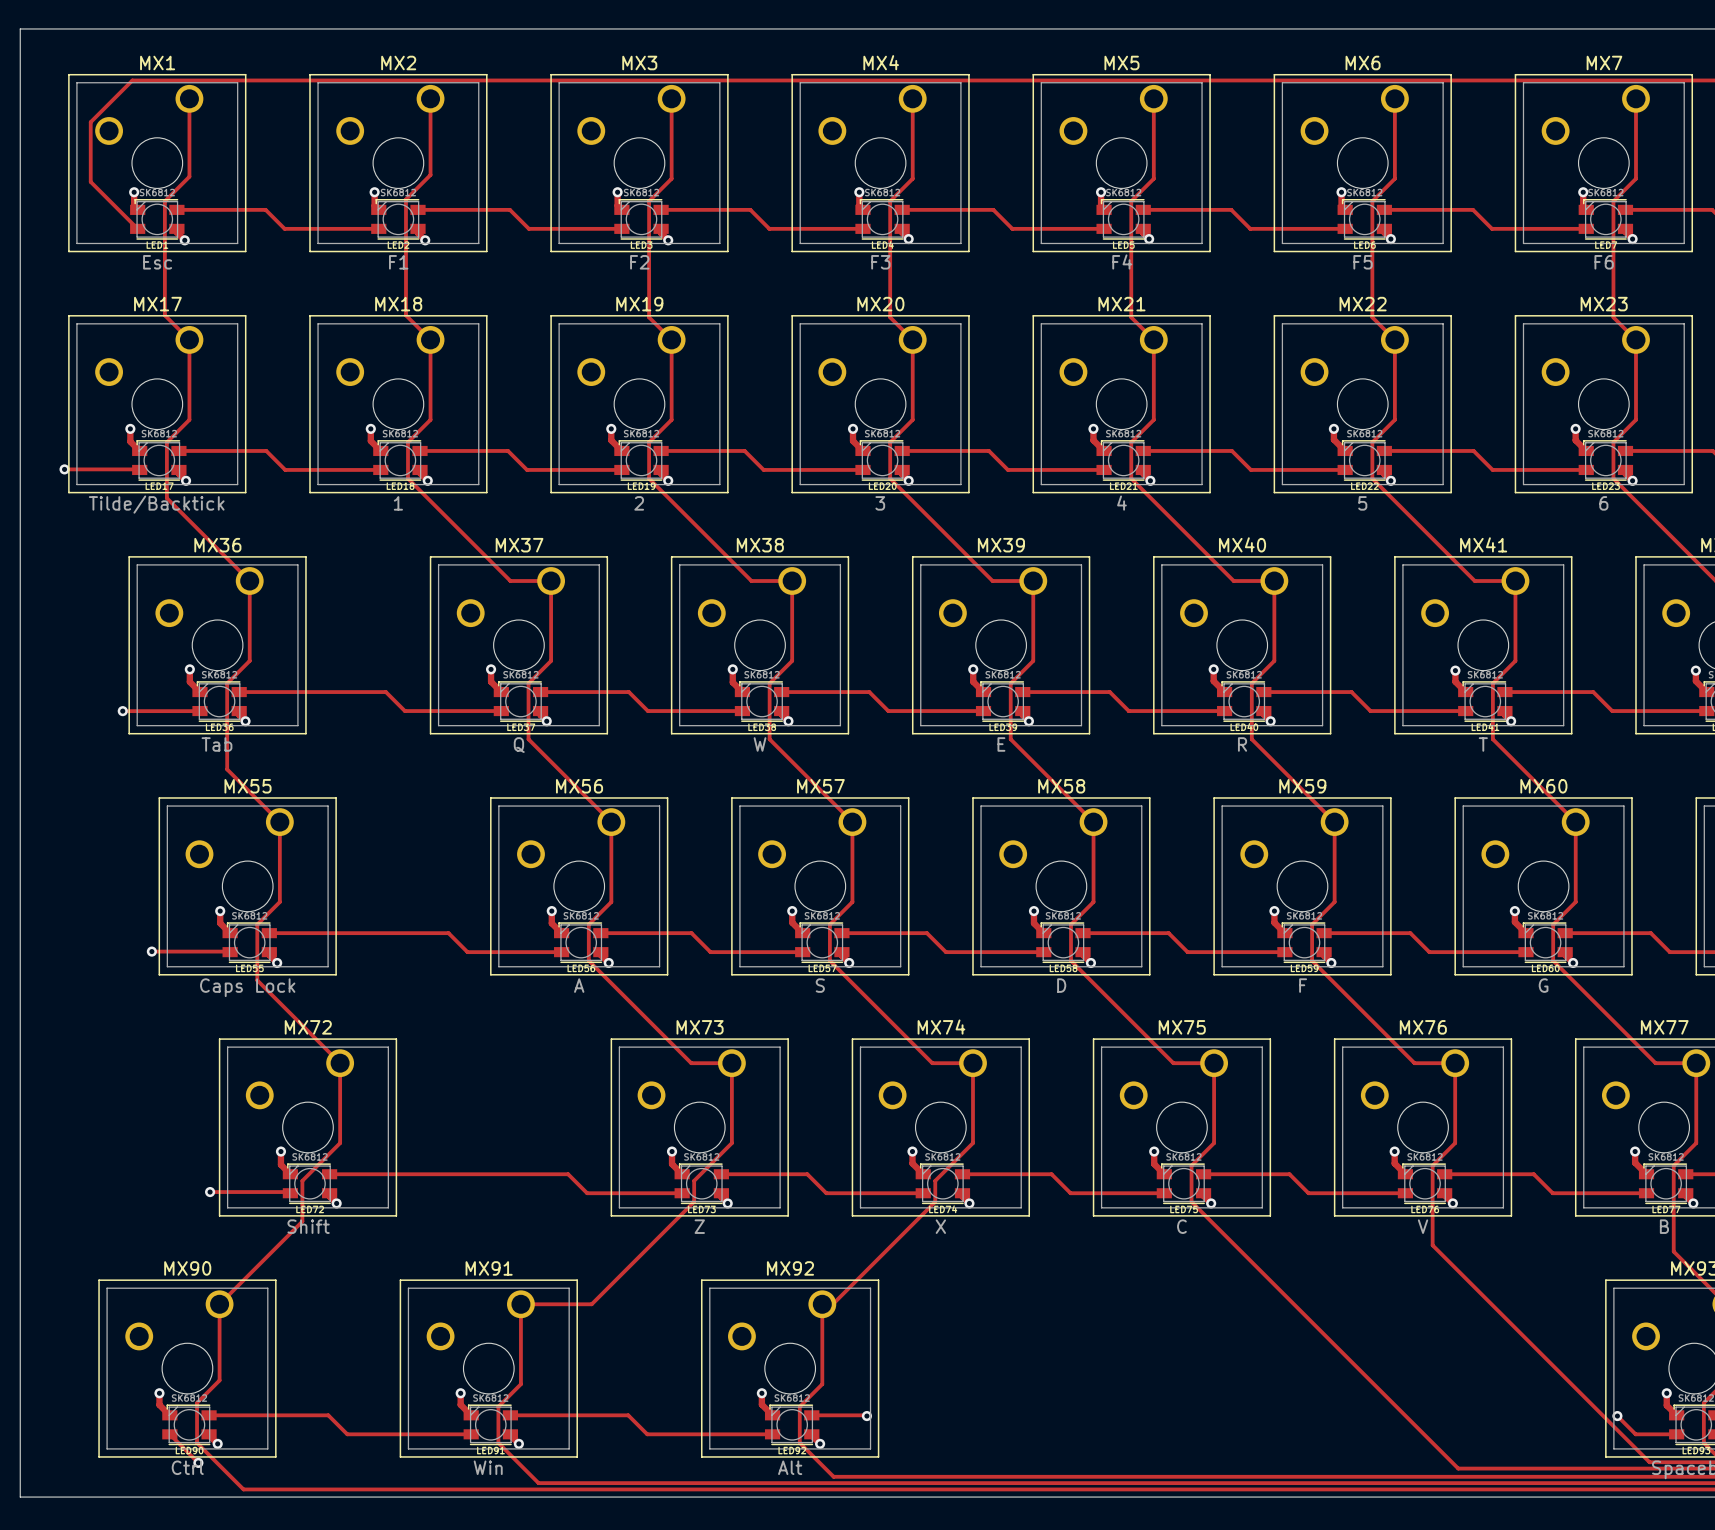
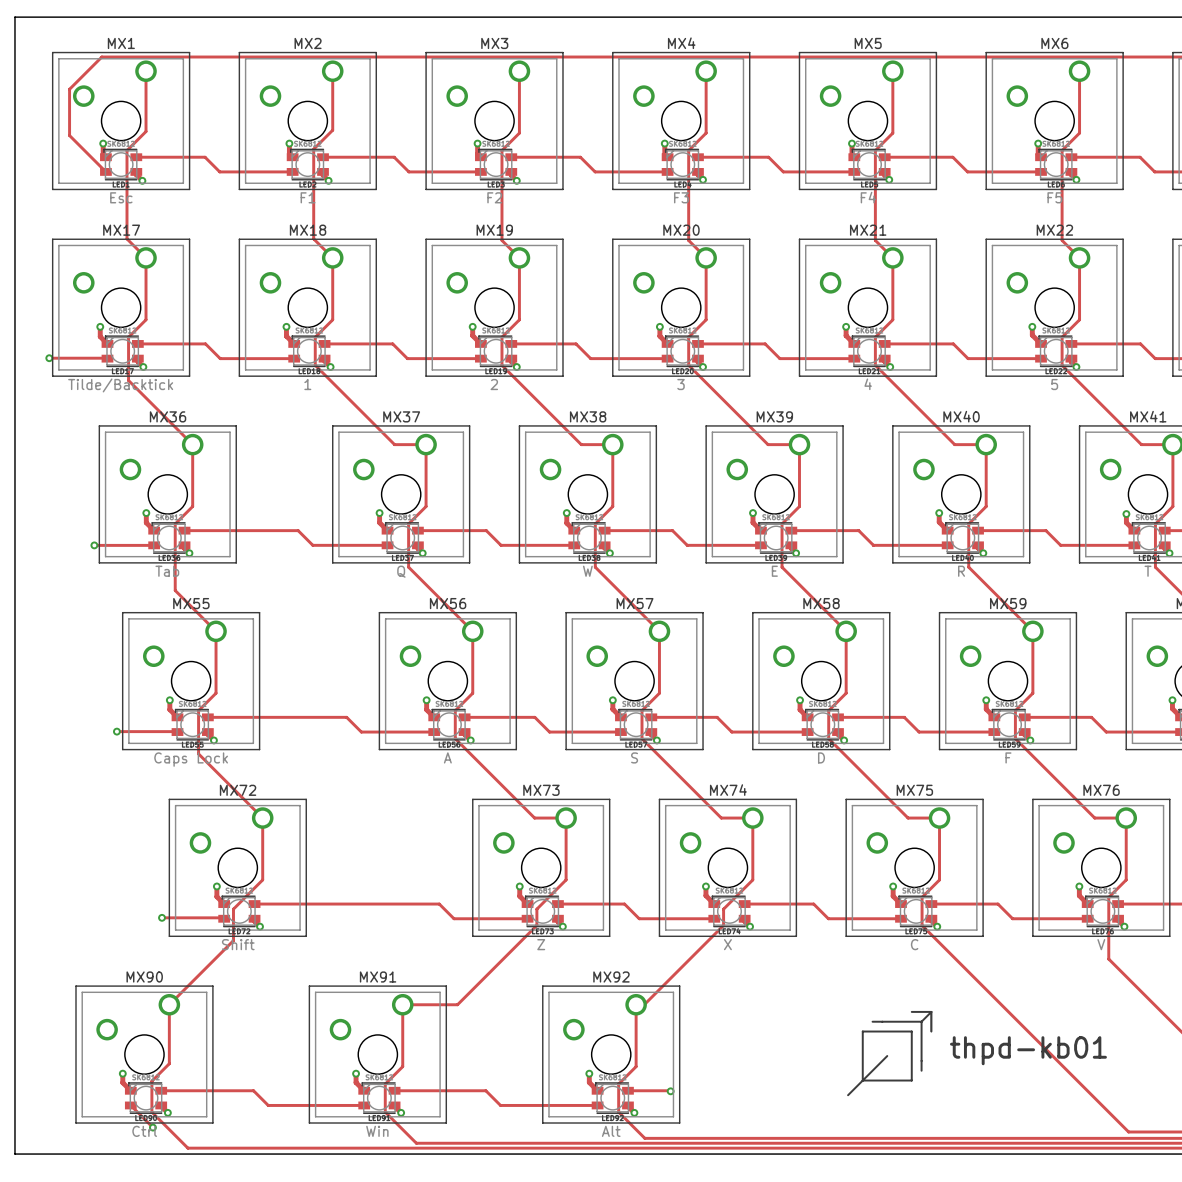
line: none -> (911, 1011) (931, 1011)
line: none -> (931, 1011) (921, 1021)
line: none -> (931, 1011) (931, 1031) (931, 1011)
line: none -> (872, 1021) (921, 1021)
line: none -> (921, 1021) (921, 1070)
line: none -> (862, 1031) (862, 1080) (911, 1080) (911, 1031) (862, 1031)
text: none -> thpd-kb01 (1028, 1050)
line: none -> (887, 1056) (848, 1095)

